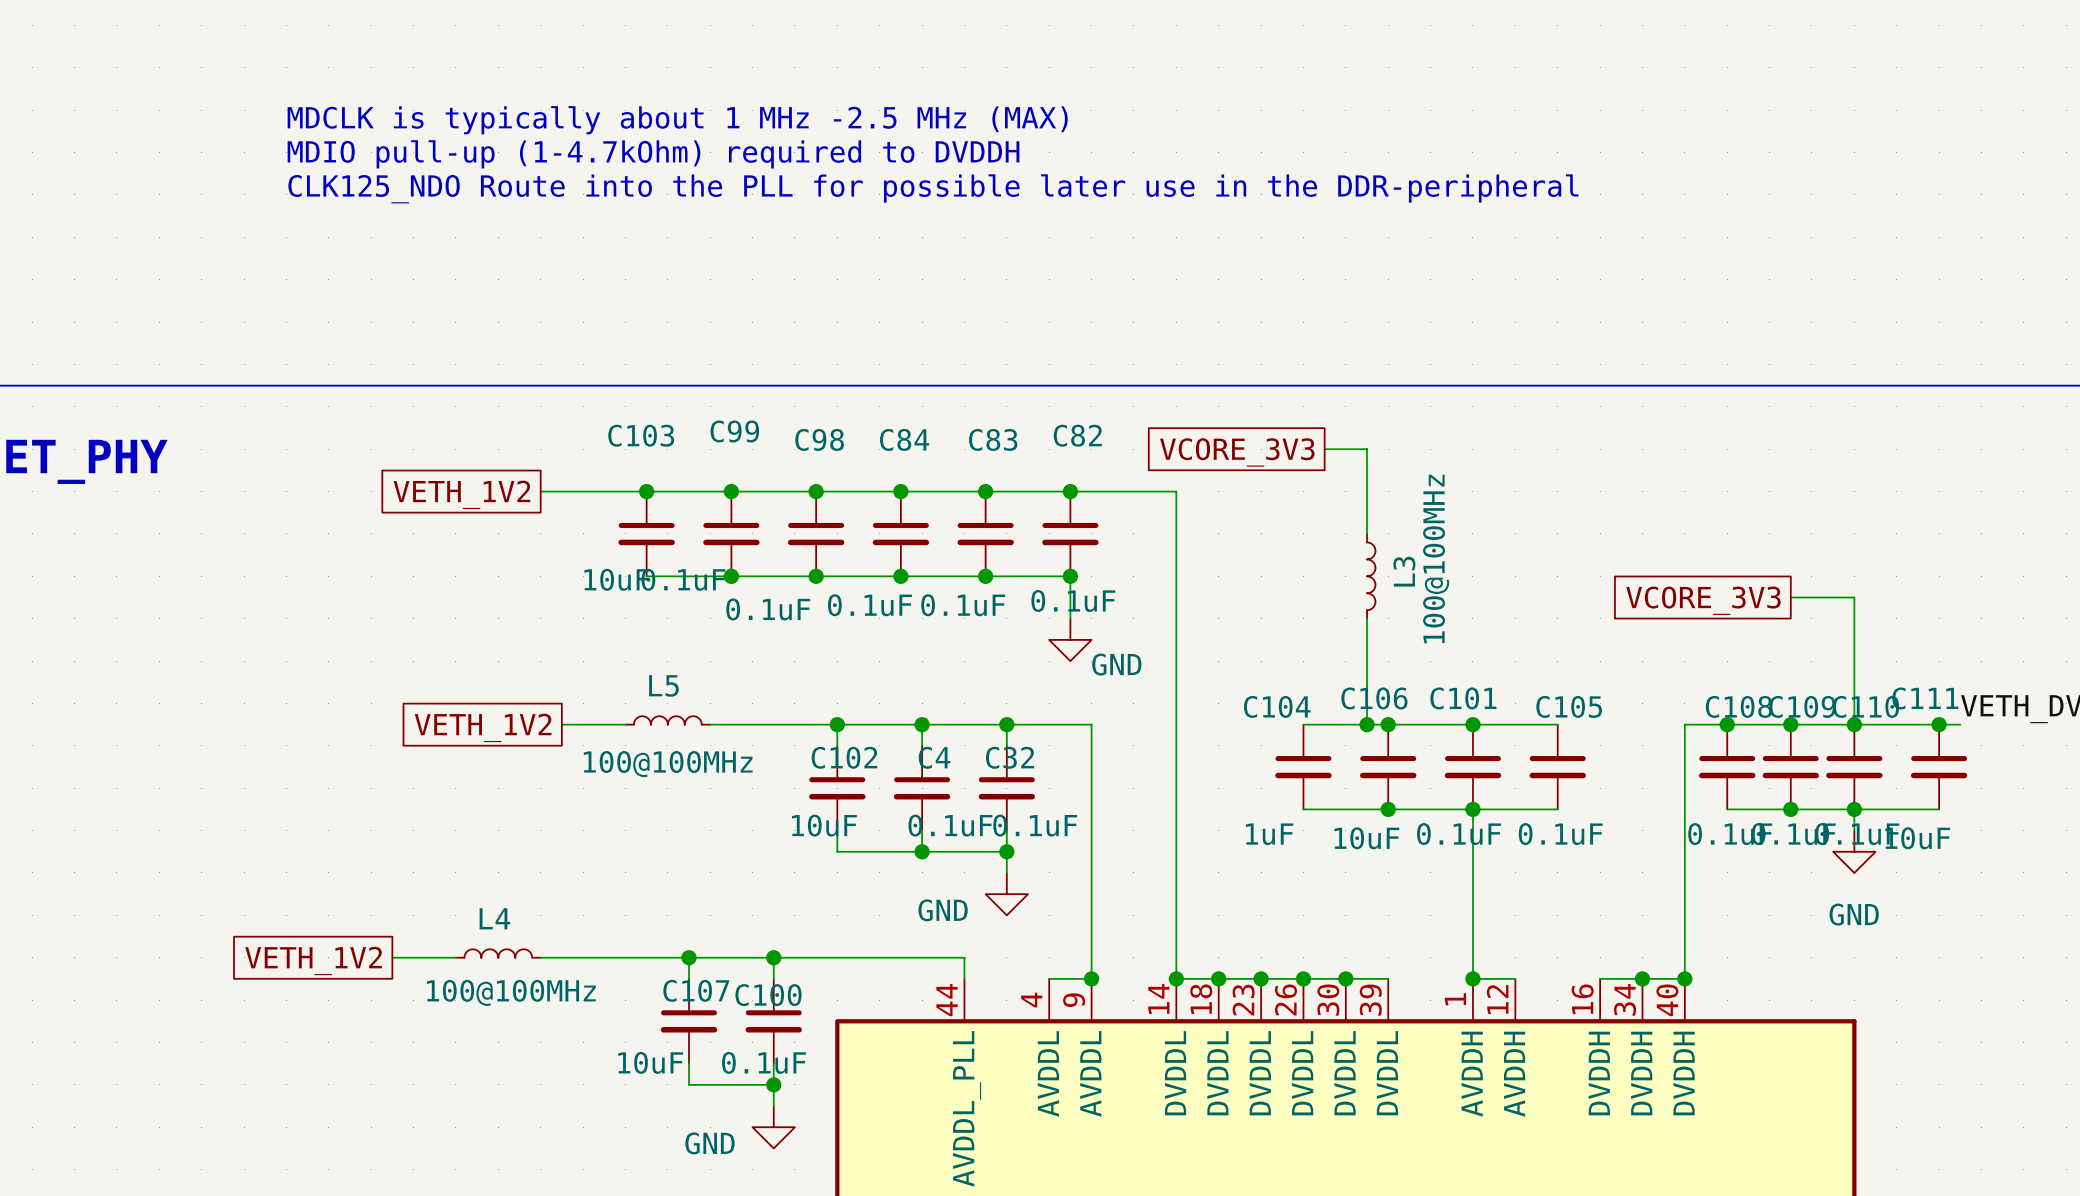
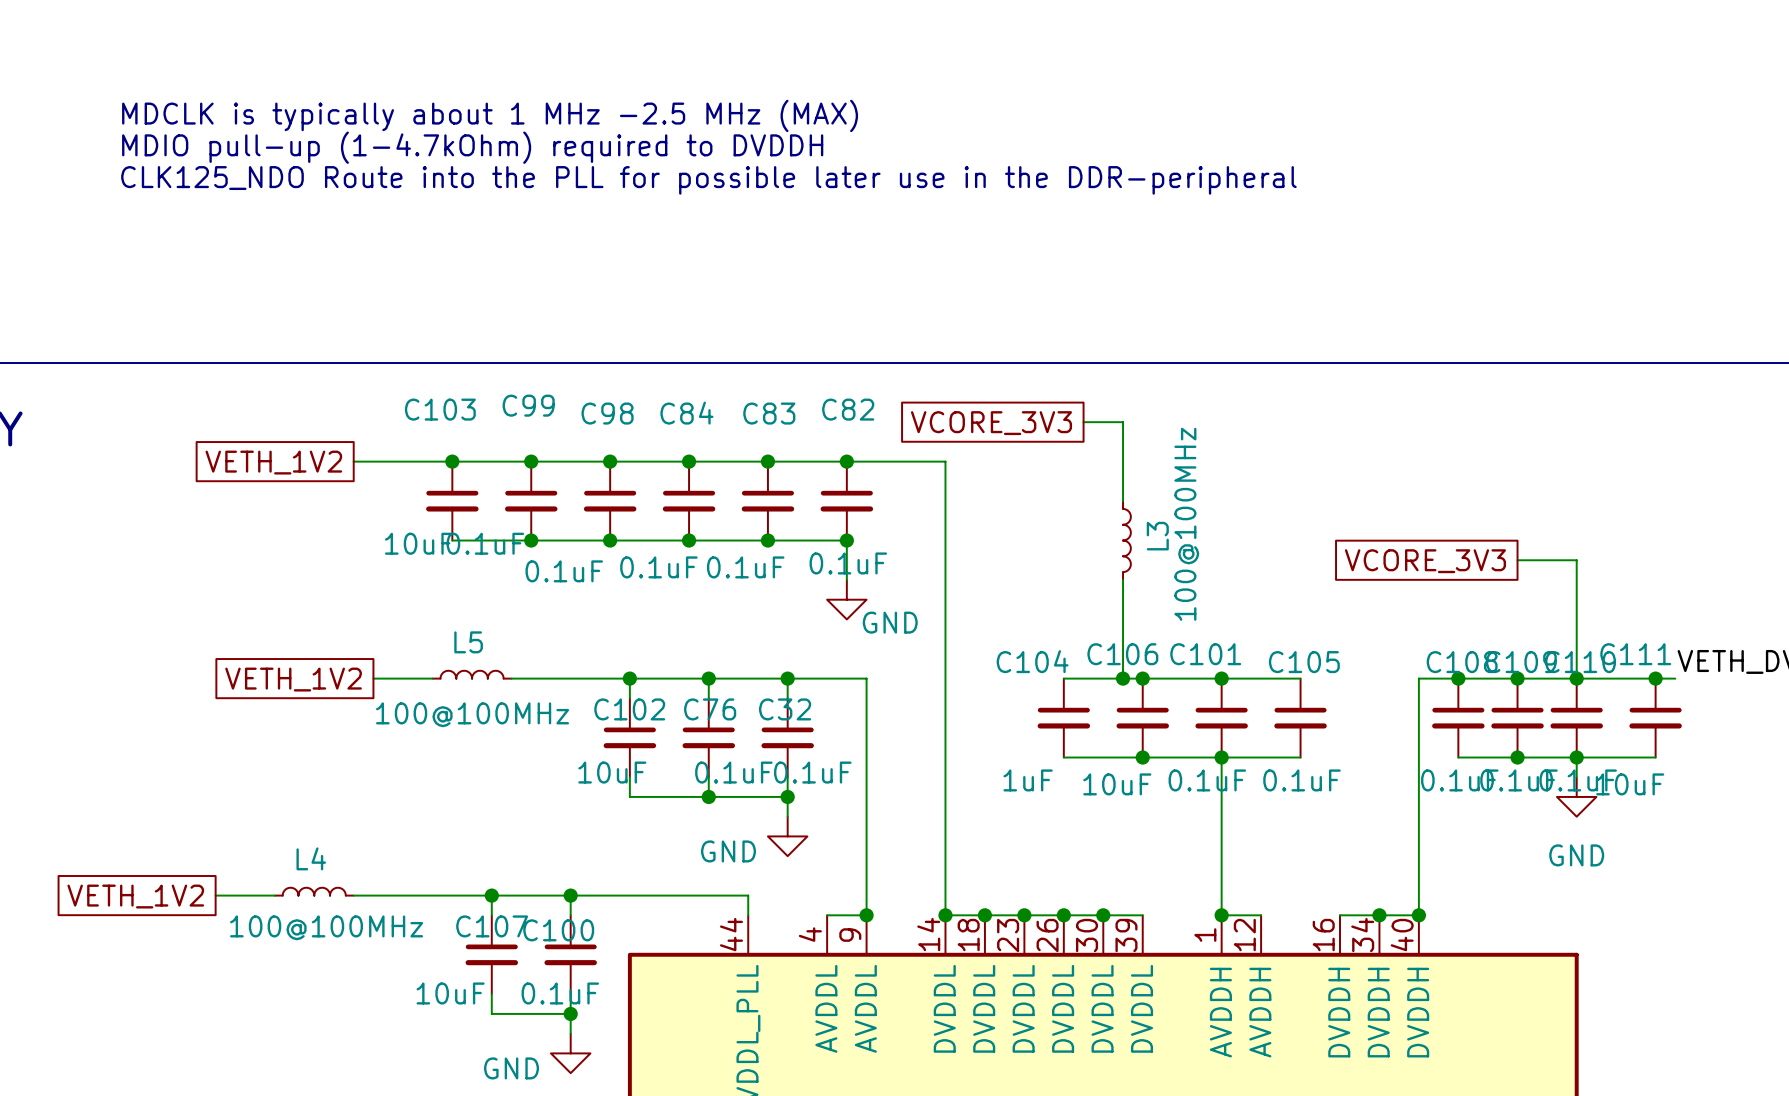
C4 name: C4 (934, 757) -> C76 (710, 709)

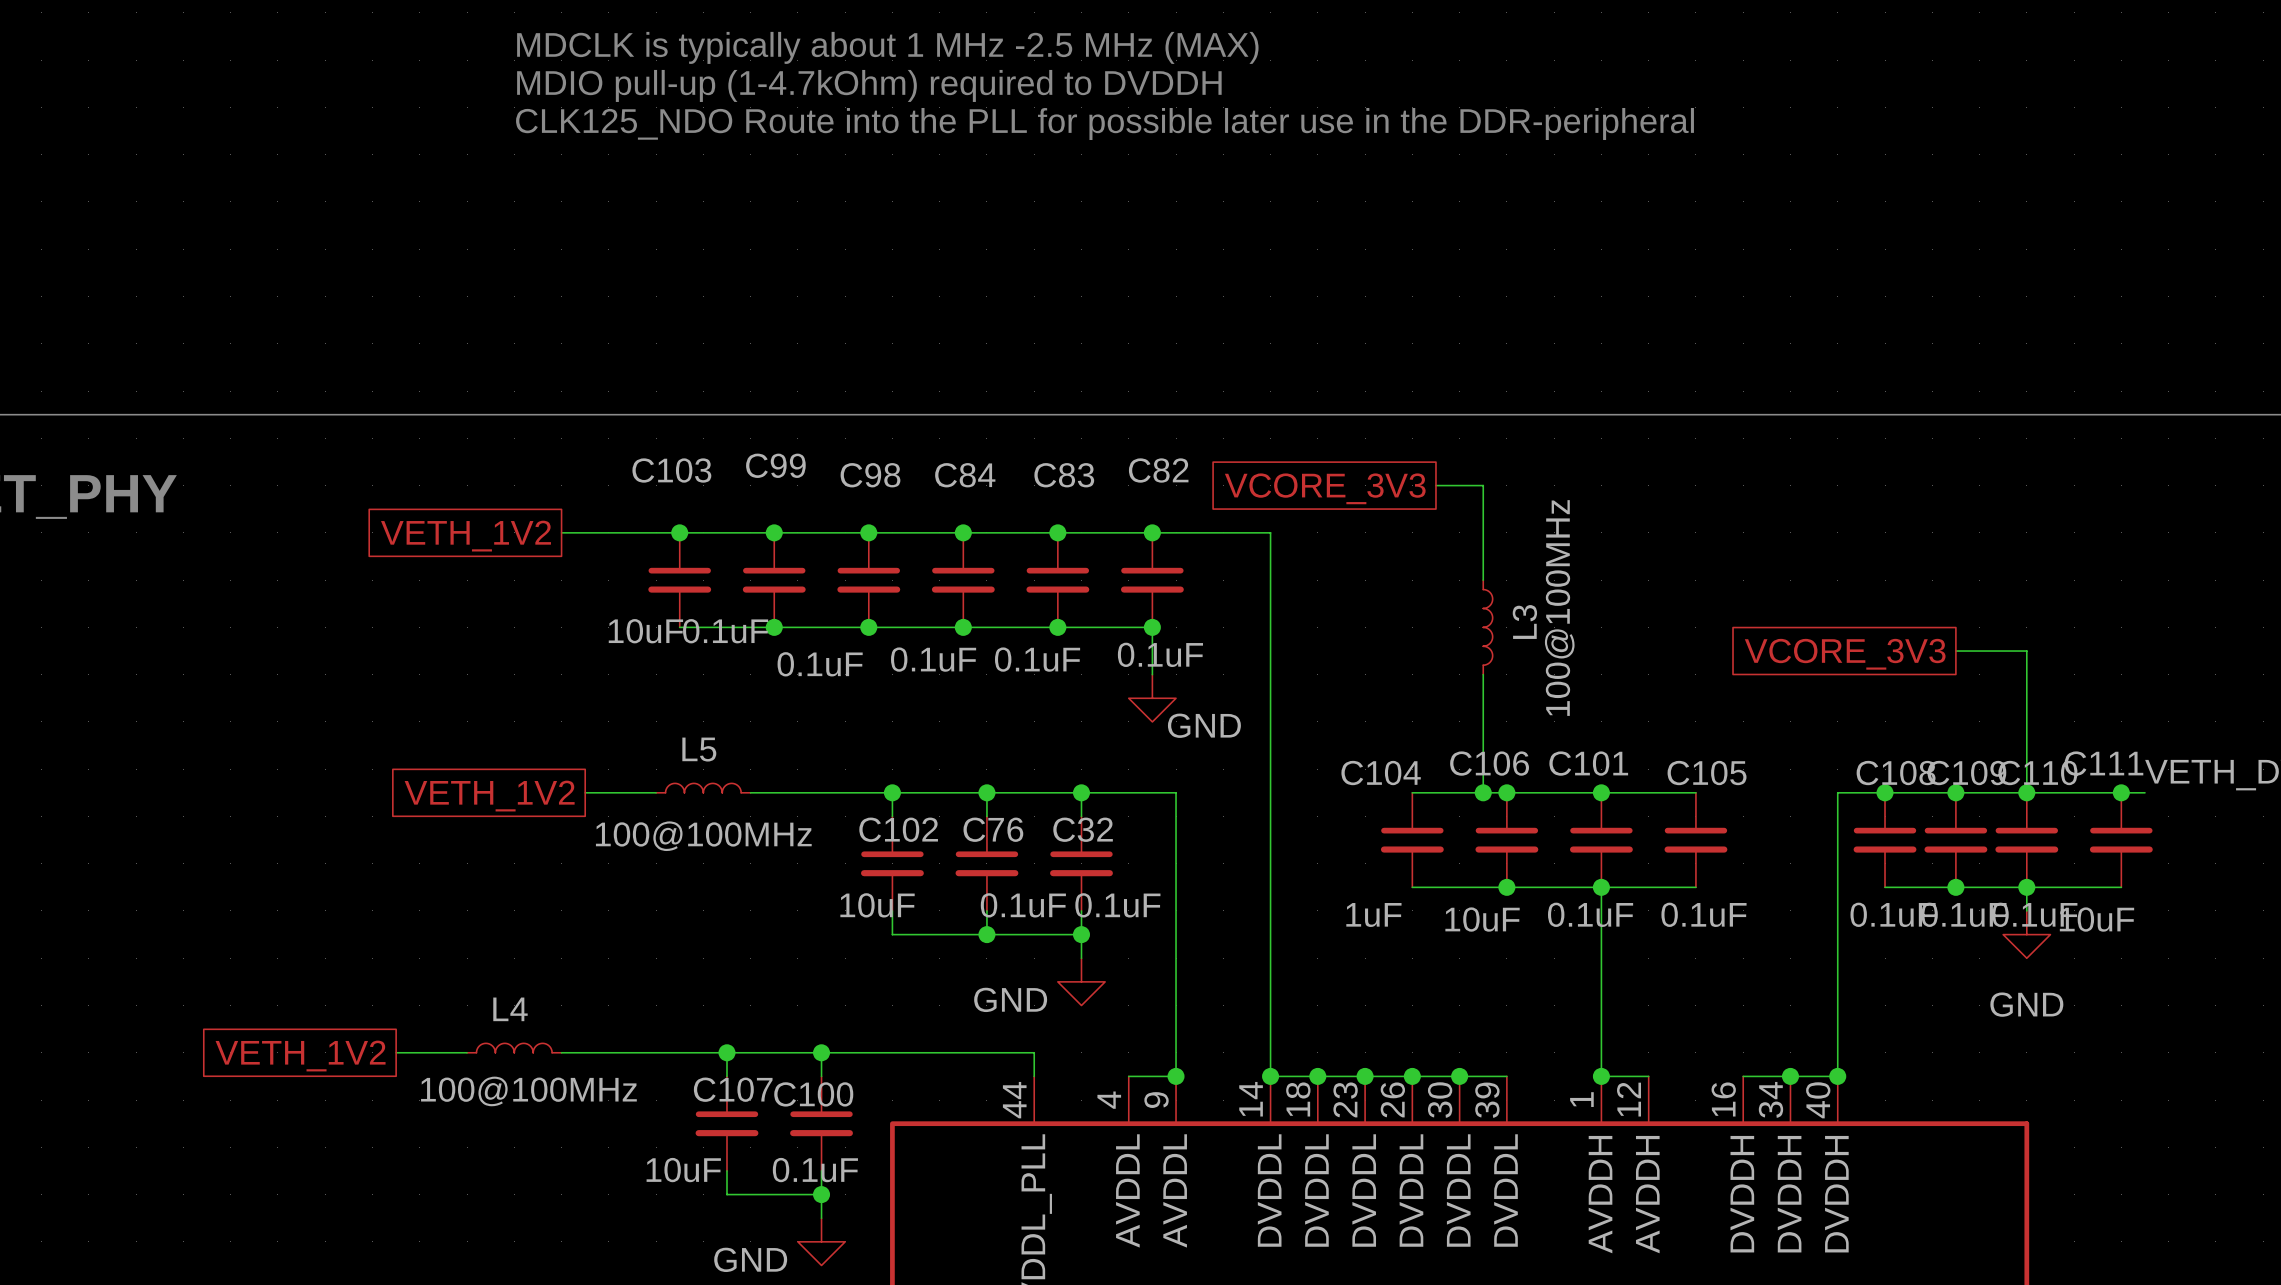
text position: MDCLK is typically about 1 MHz -2.5 MHz (MAX) (490, 115) -> MDCLK is typically about 1 MHz -2.5 MHz (MAX) (887, 47)
text position: MDIO pull-up (1-4.7kOhm) required to DVDDH (472, 147) -> MDIO pull-up (1-4.7kOhm) required to DVDDH (869, 85)
text position: CLK125_NDO Route into the PLL for possible later use in the DDR-peripheral (708, 180) -> CLK125_NDO Route into the PLL for possible later use in the DDR-peripheral (1104, 124)

